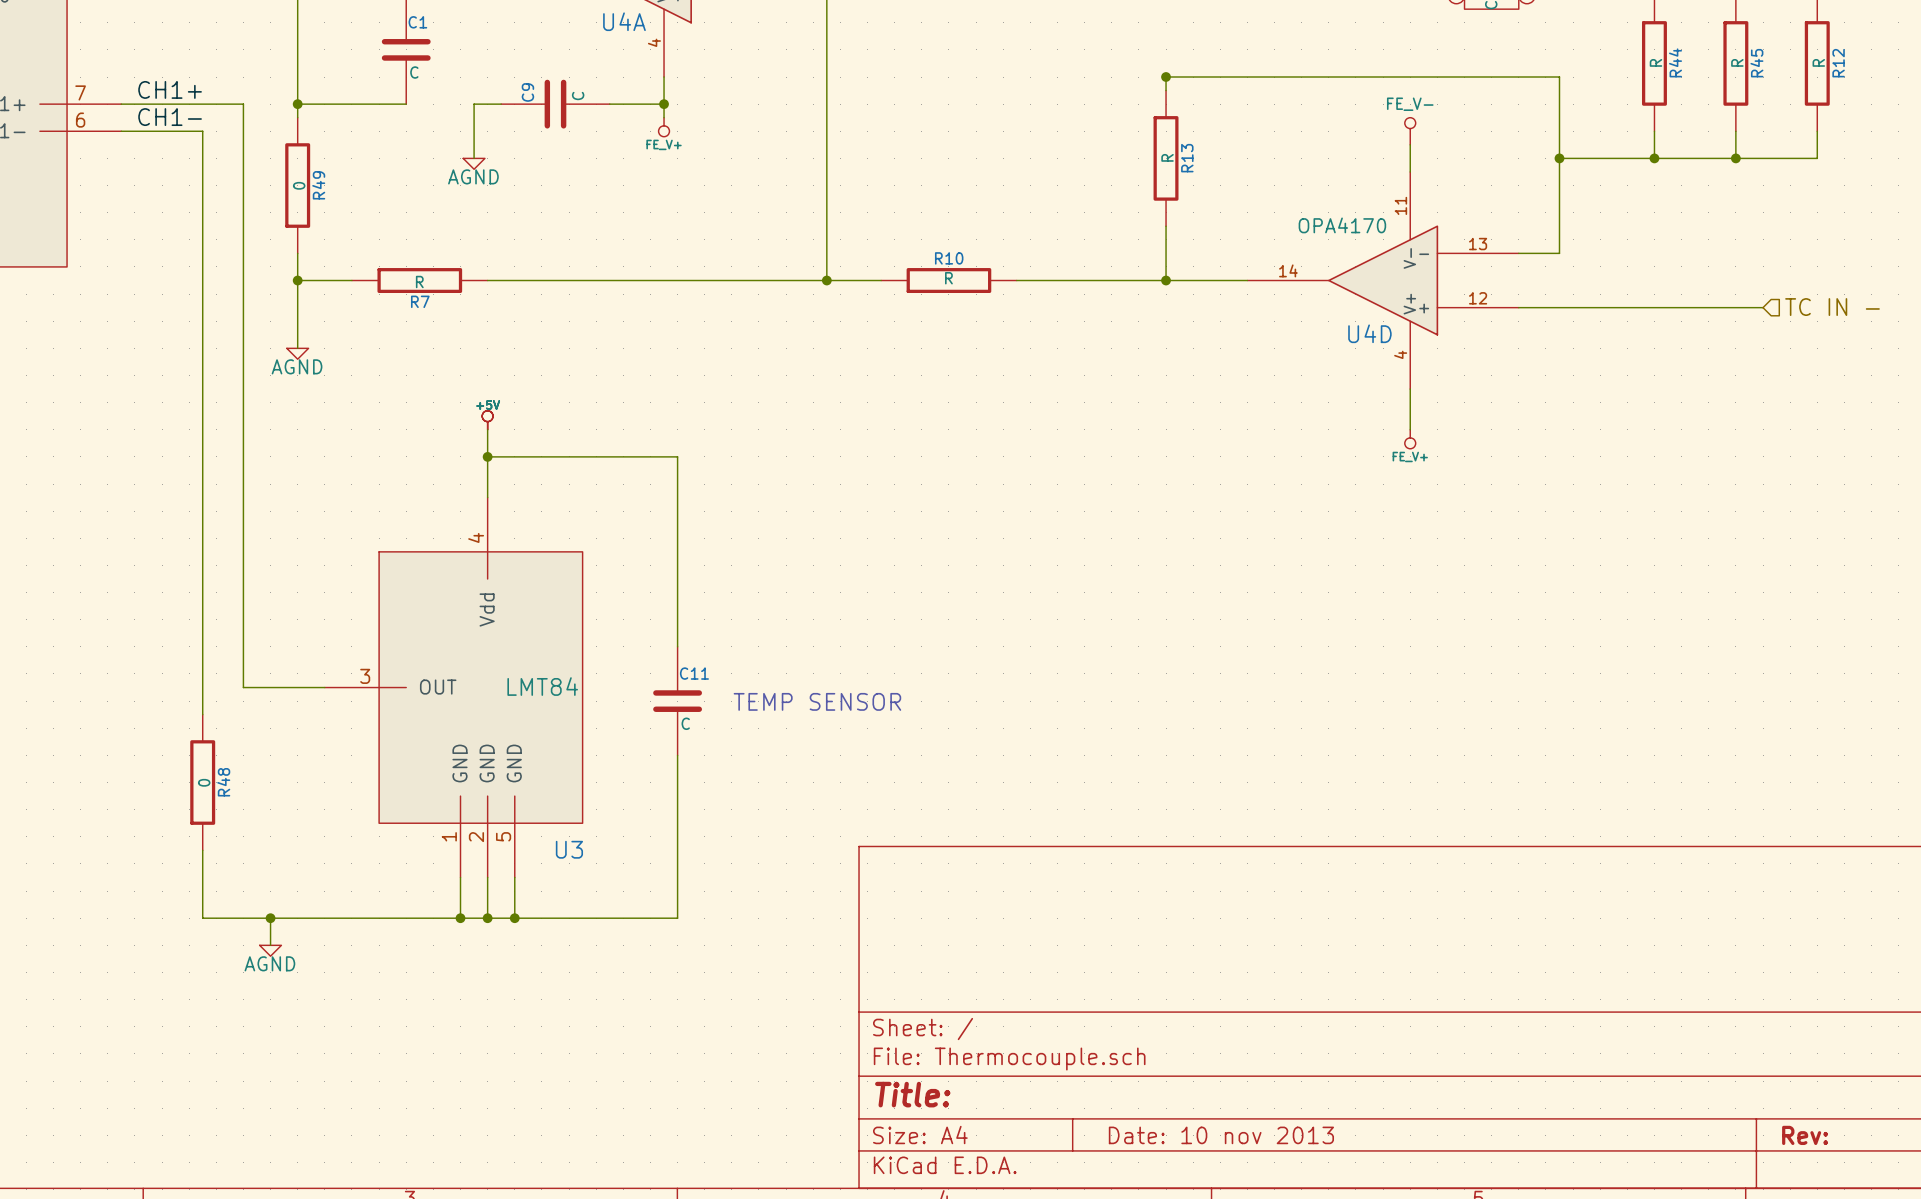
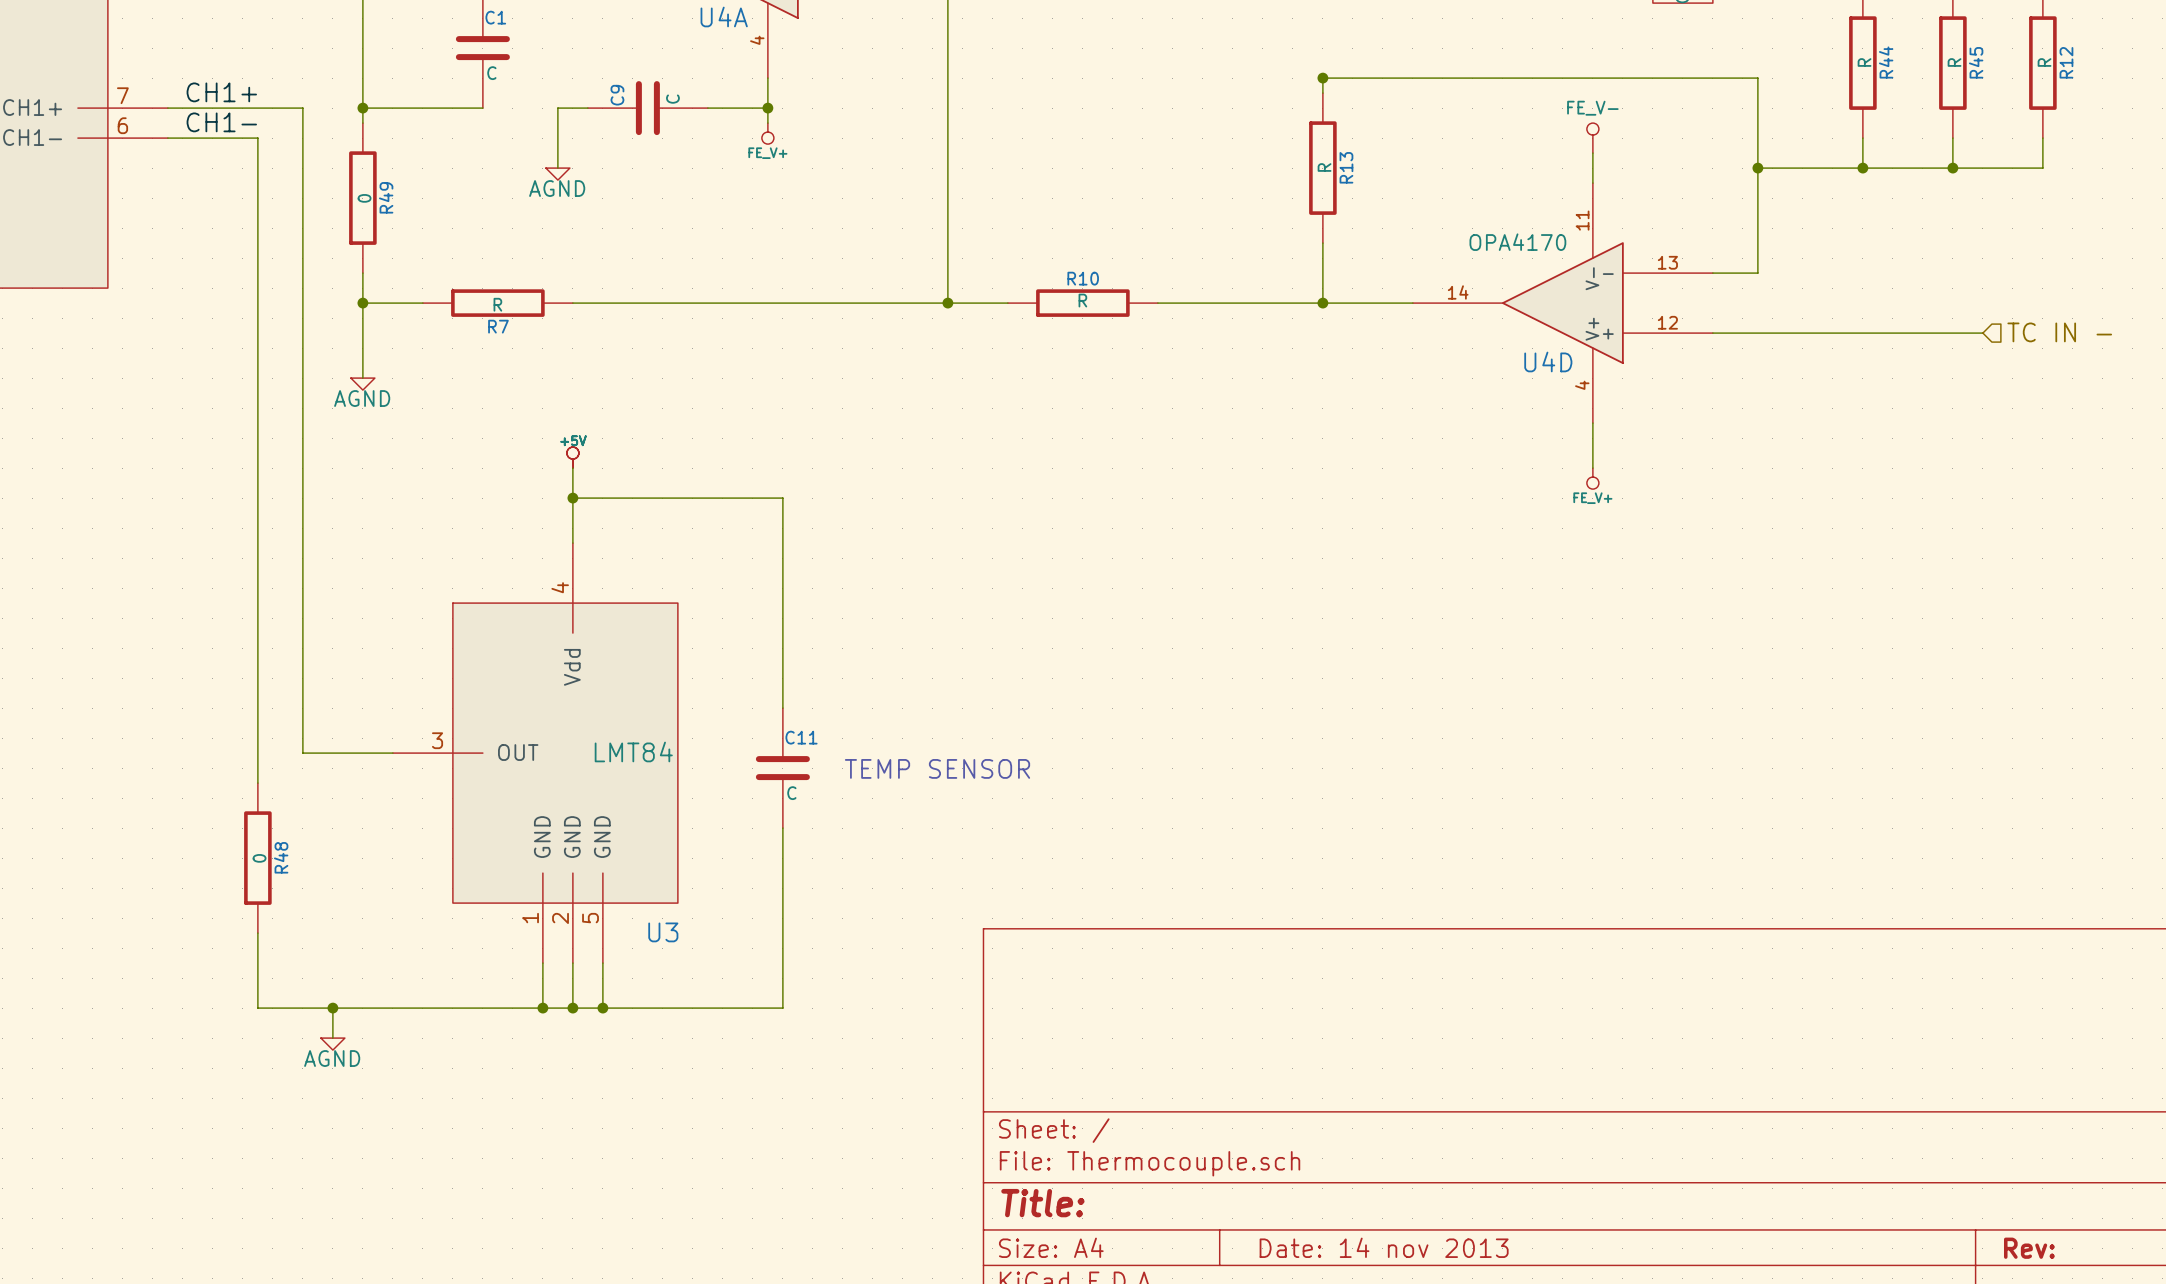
title block: Date: 10 nov 2013 (1221, 1135) -> Date: 14 nov 2013 (1384, 1247)

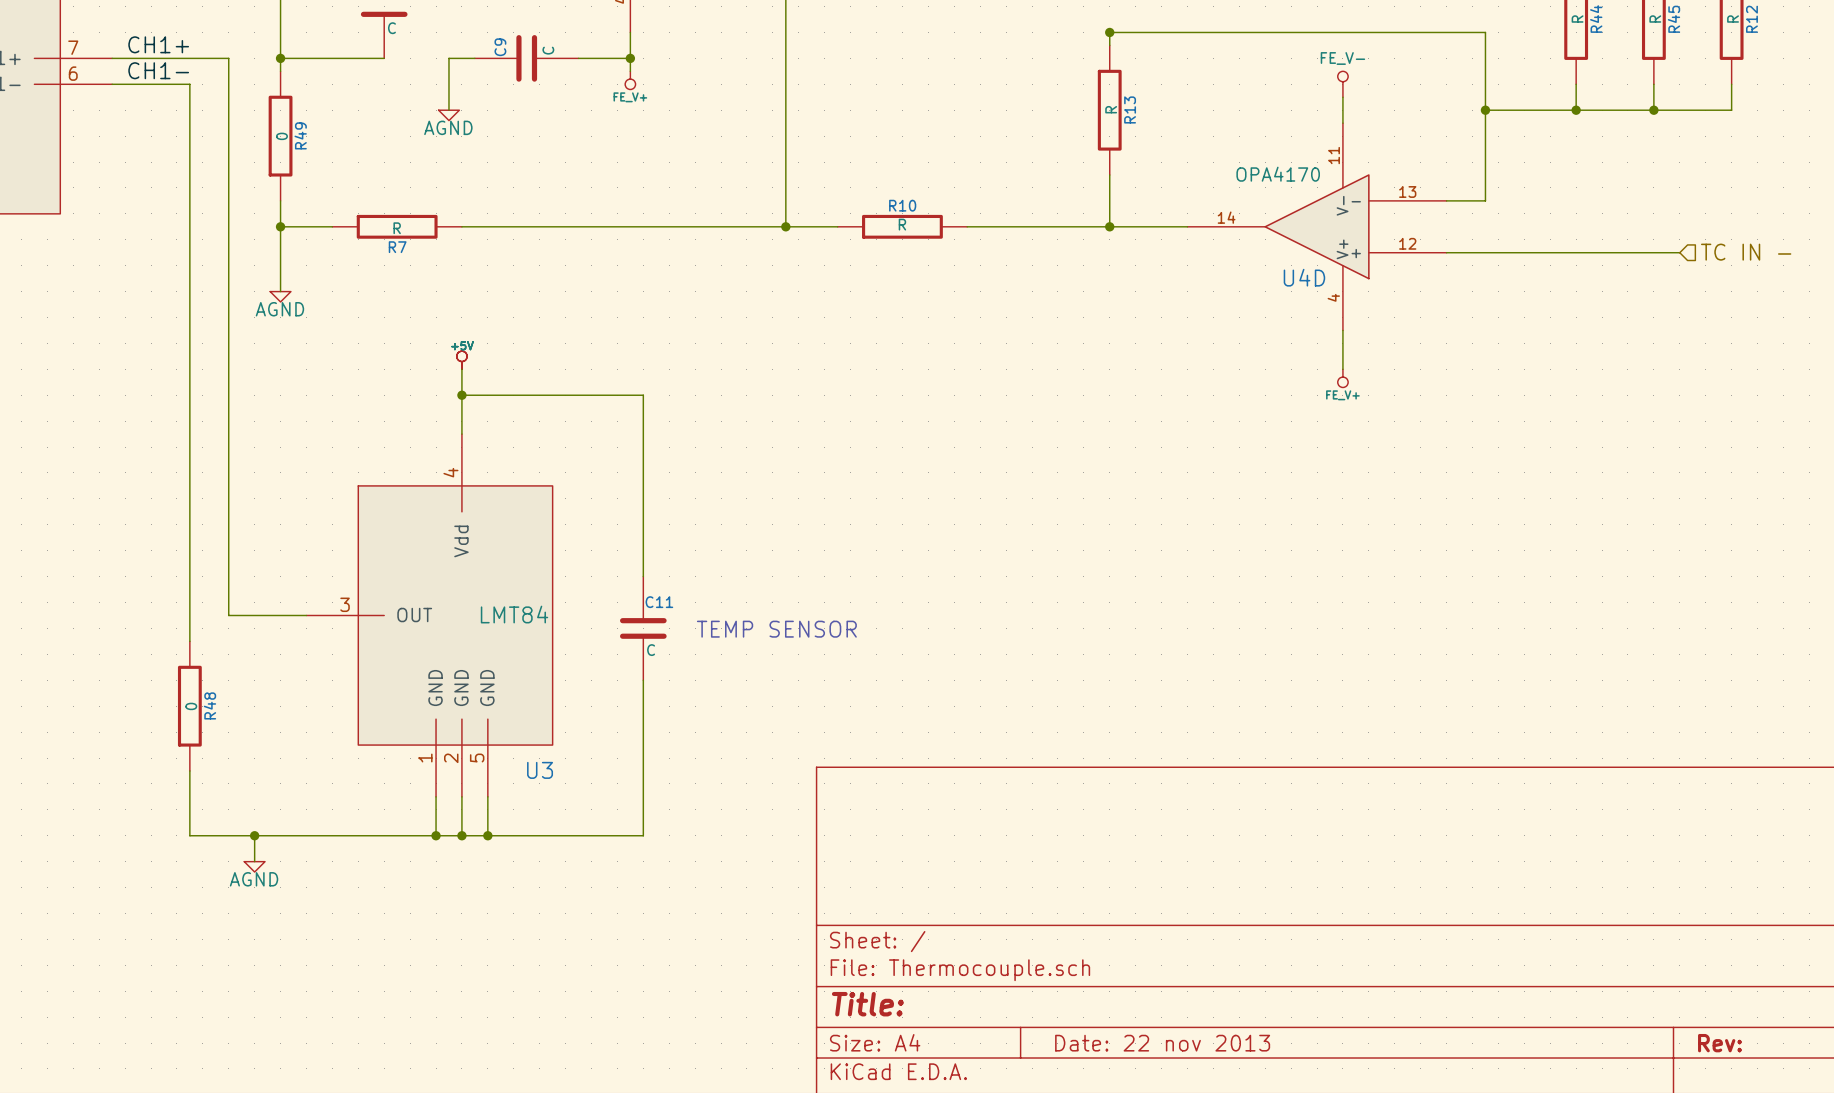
title block: Date: 14 nov 2013 (1384, 1247) -> Date: 22 nov 2013 (1162, 1043)

